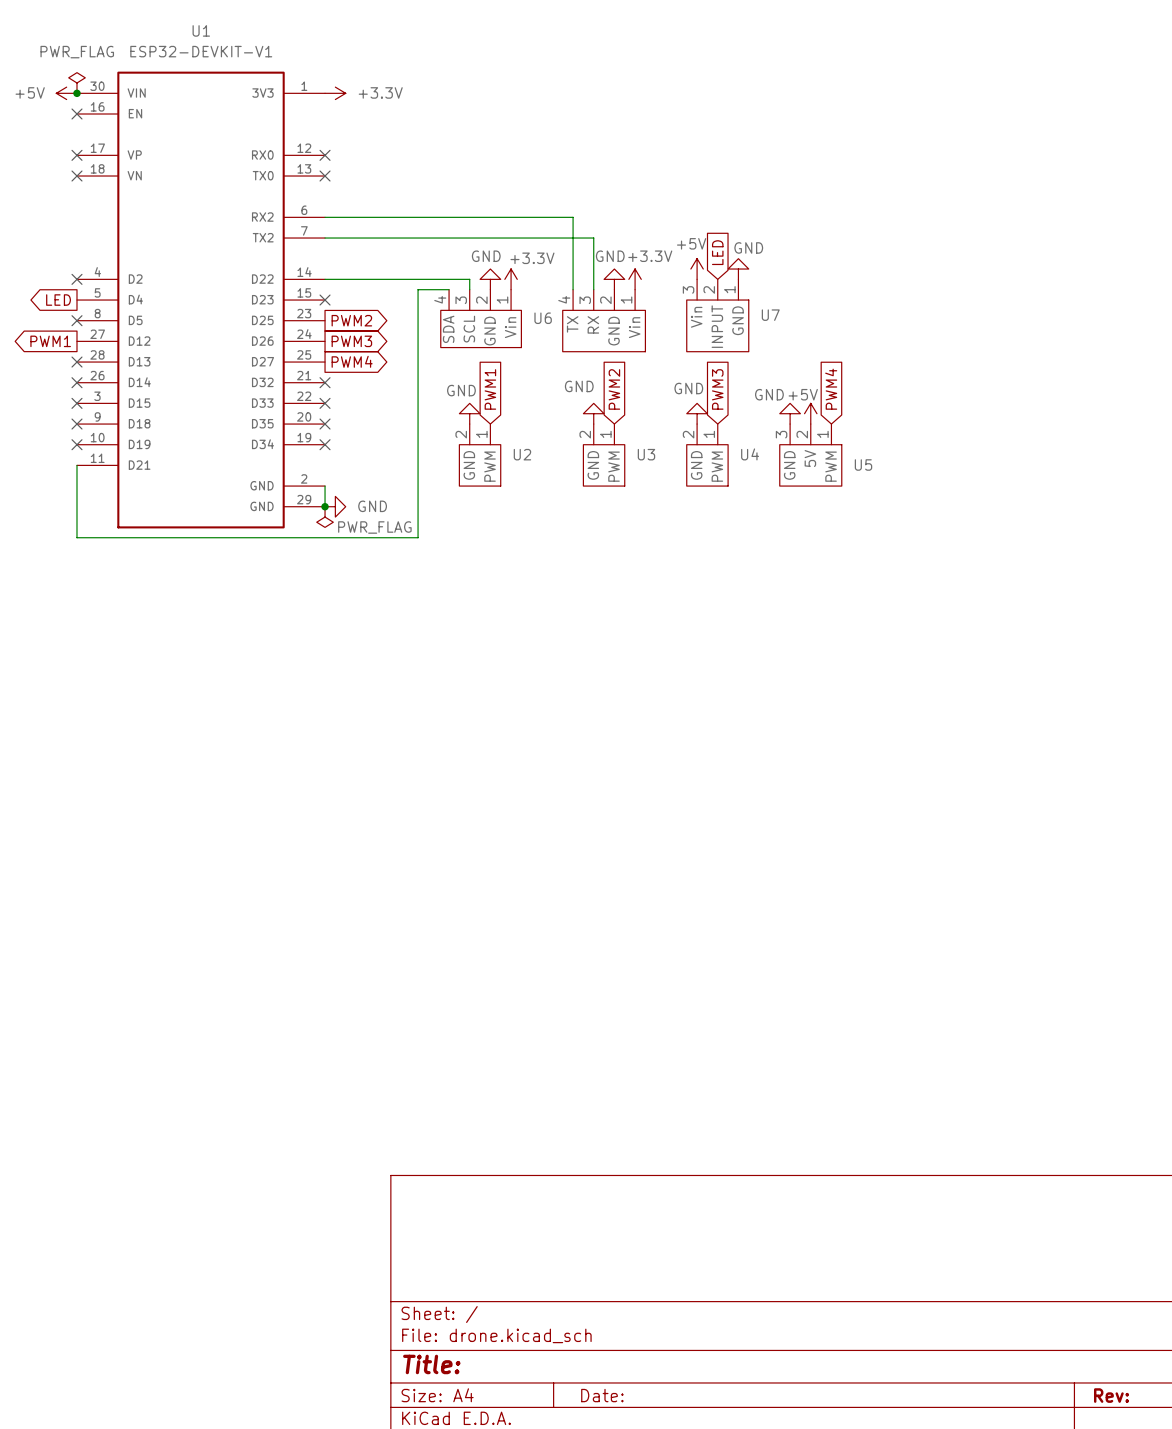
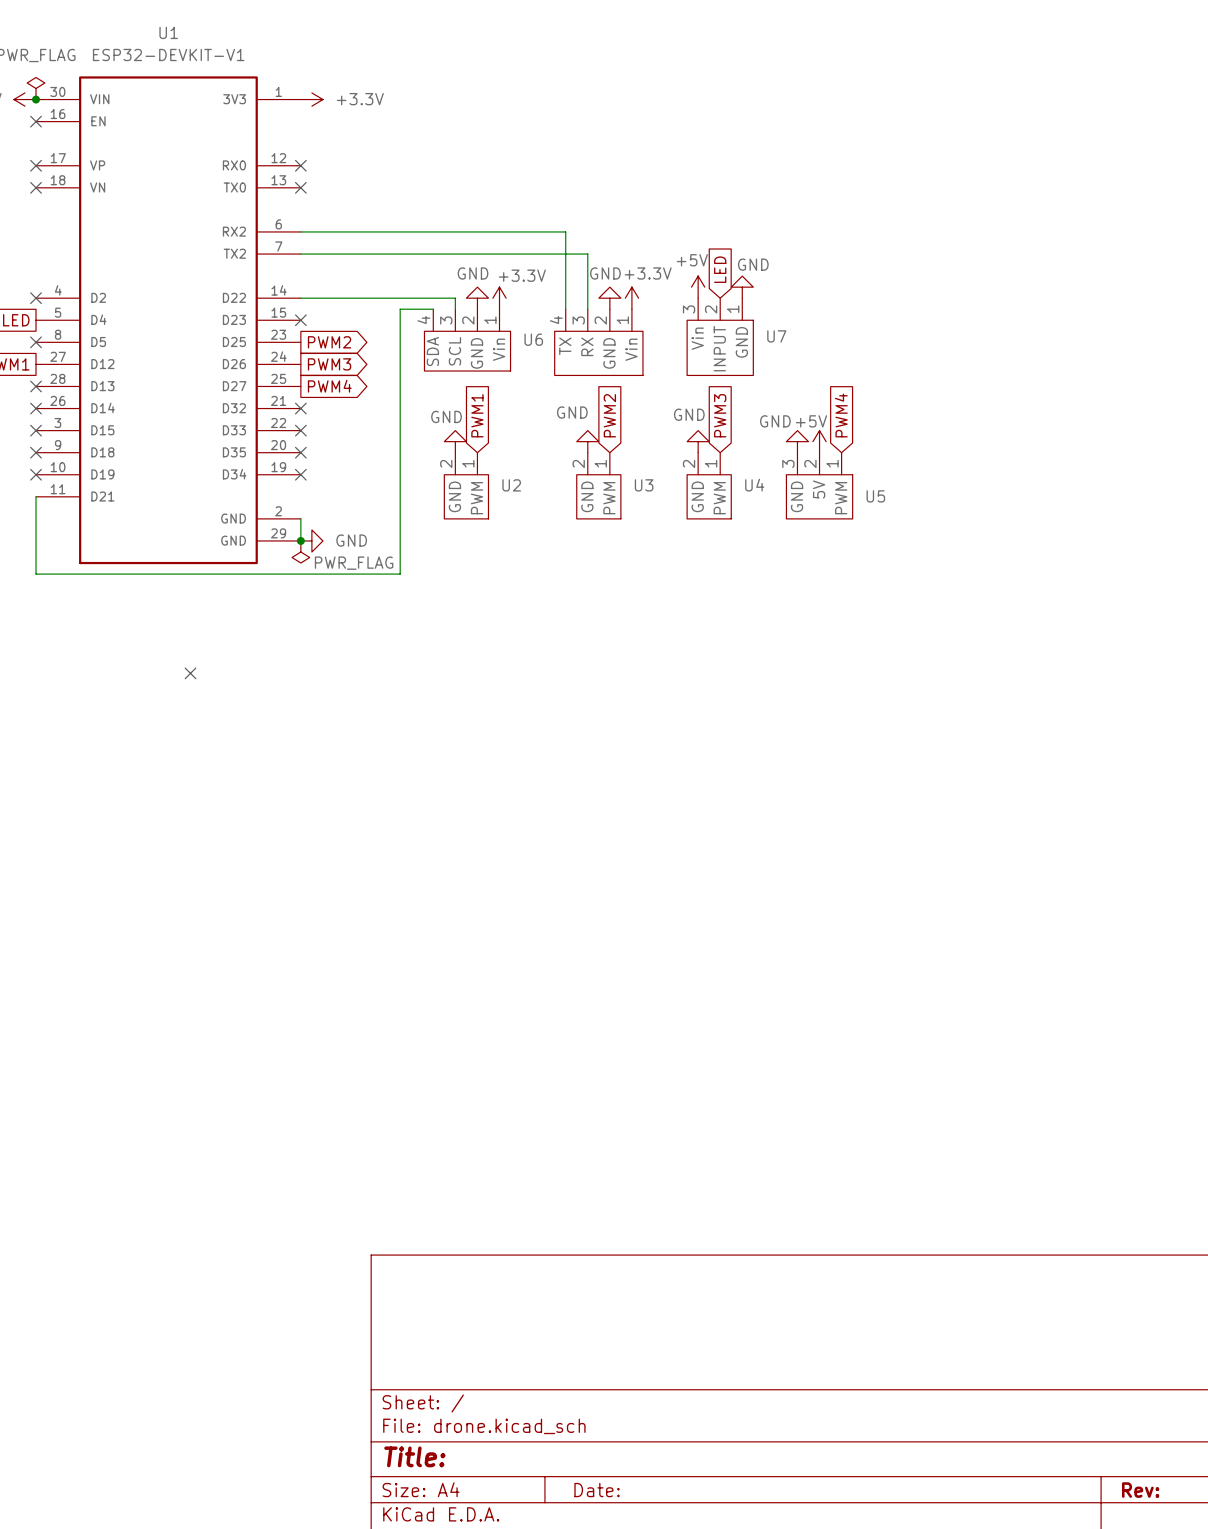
no-connect mark: none -> (190, 673)

